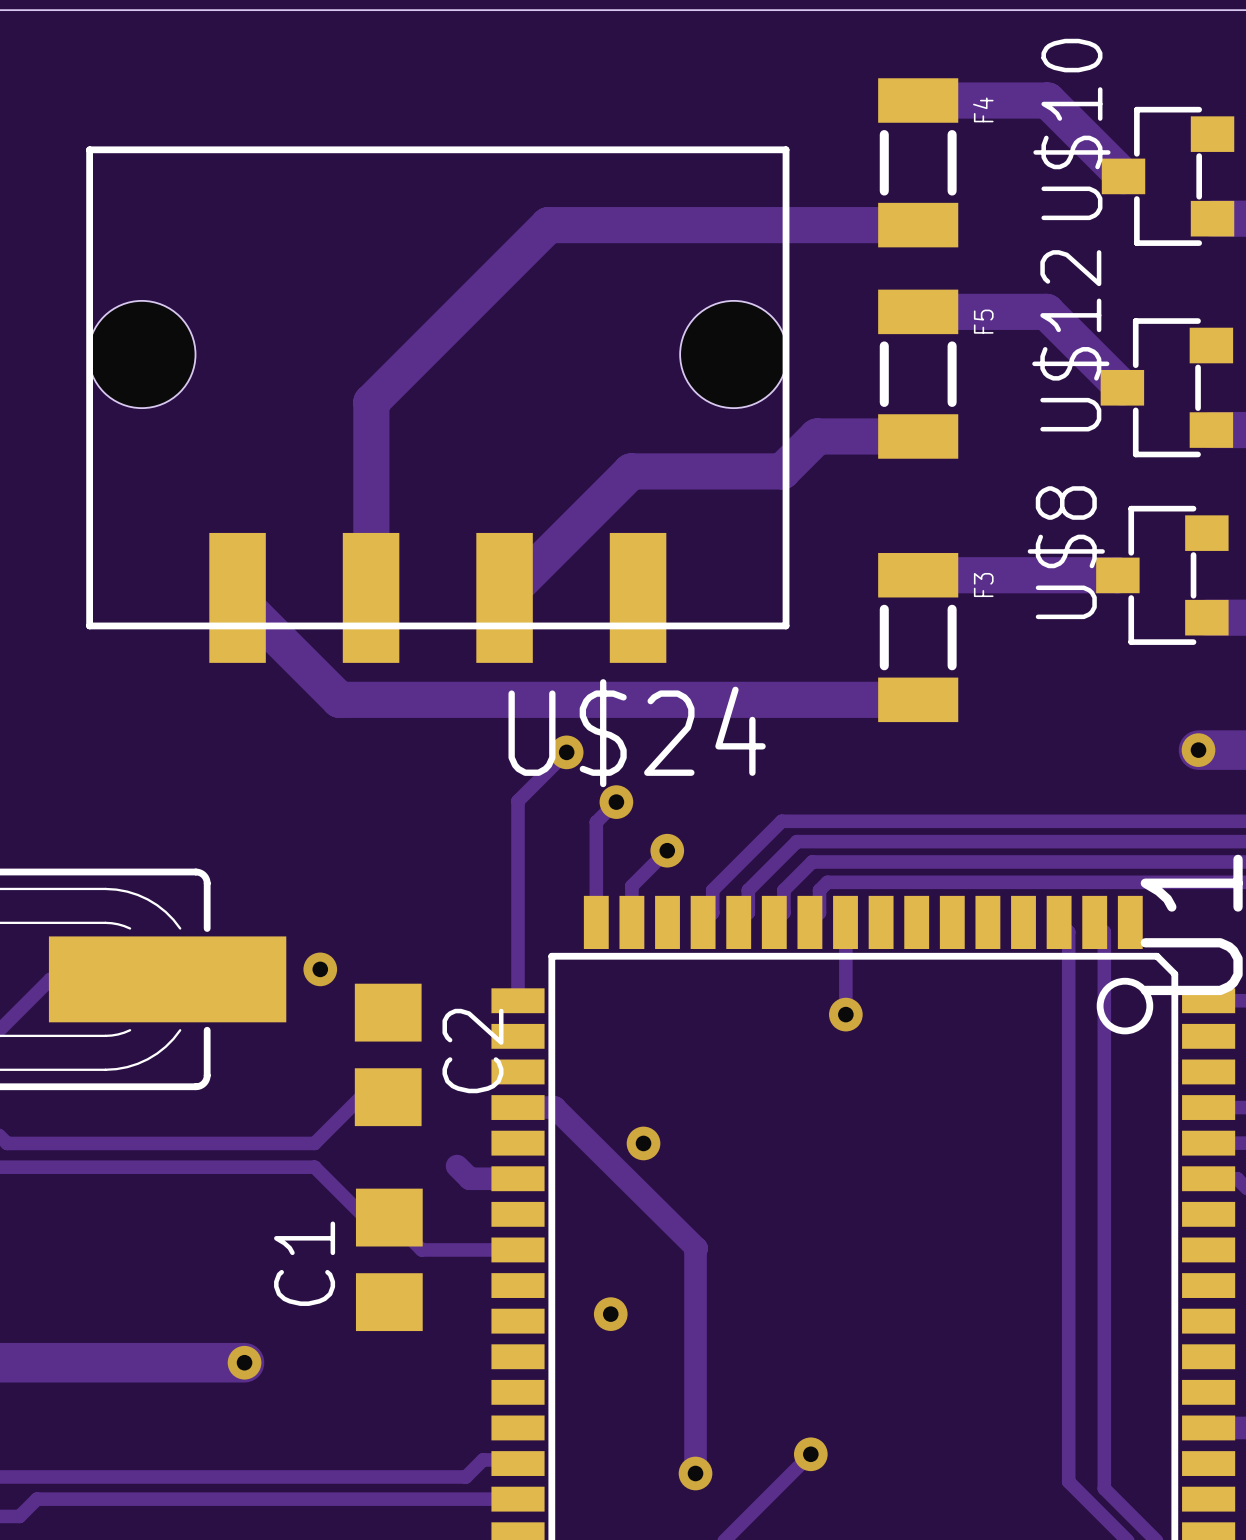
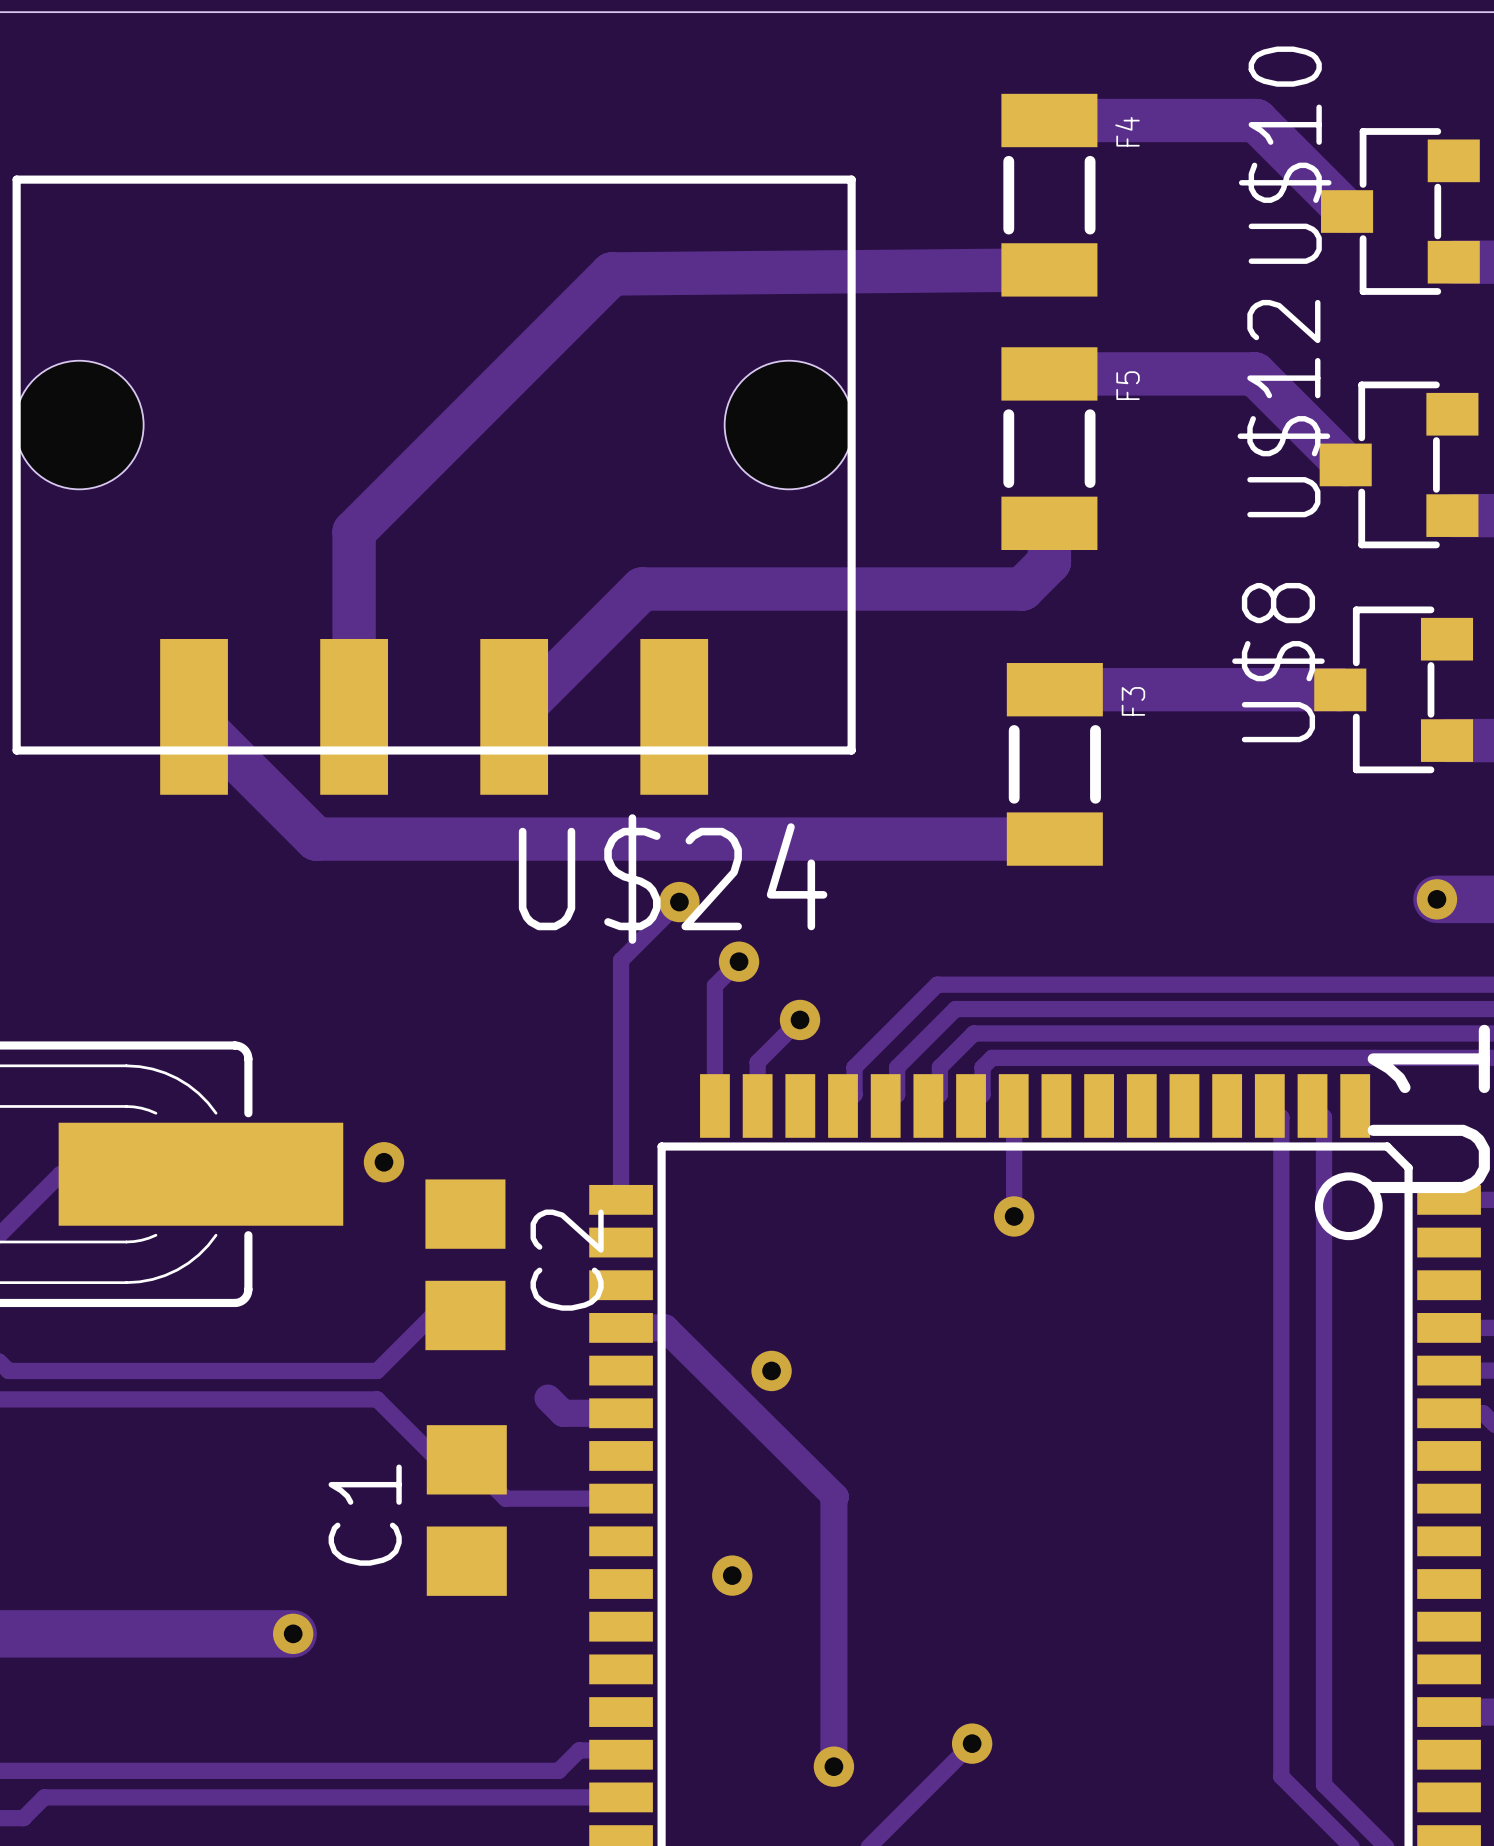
F4 position: (918, 162) -> (1049, 195)
track: none -> (1049, 269) (611, 273) (354, 531) (354, 716)
track: (918, 225) (548, 225) (371, 402) (371, 597) -> none
F5 position: (918, 374) -> (1049, 448)
U$24 position: (437, 404) -> (434, 485)
track: none -> (1049, 523) (1049, 561) (1022, 589) (642, 589) (514, 716)
track: (918, 436) (817, 436) (782, 471) (631, 471) (504, 597) -> none
track: (237, 597) (339, 699) -> (194, 716) (316, 839) (407, 839)
F3 position: (918, 637) -> (1054, 764)

